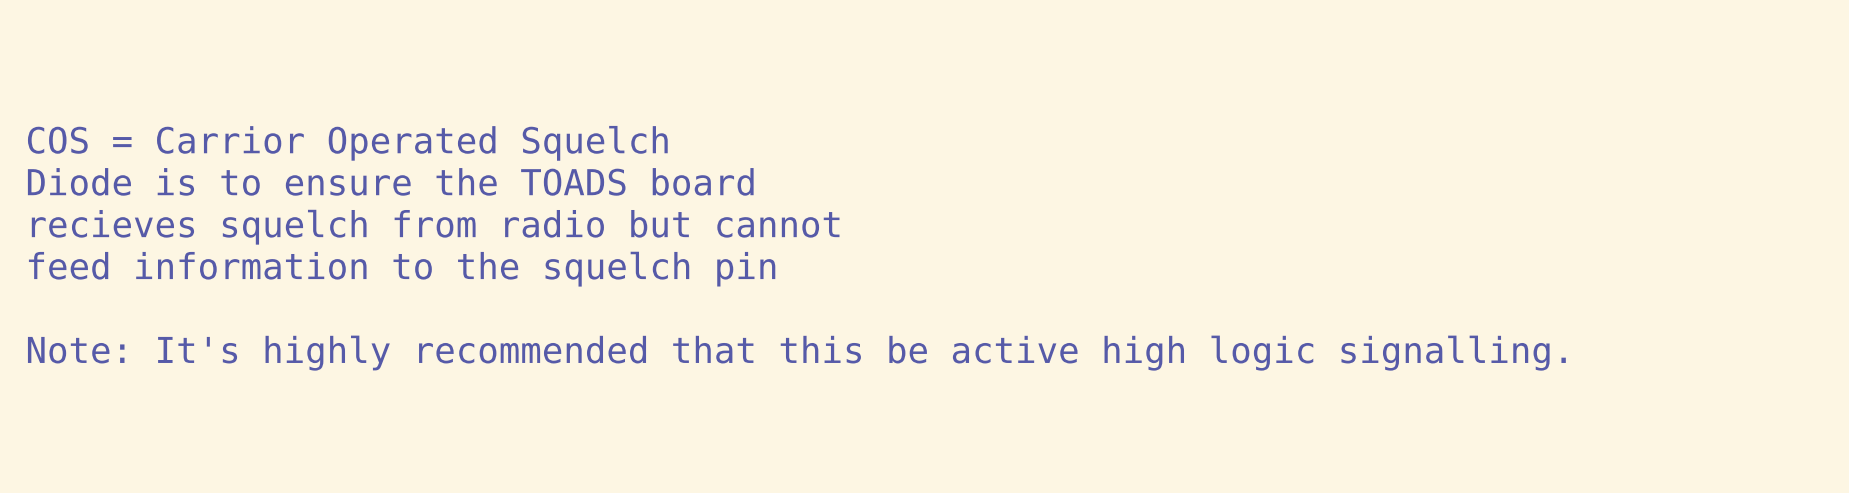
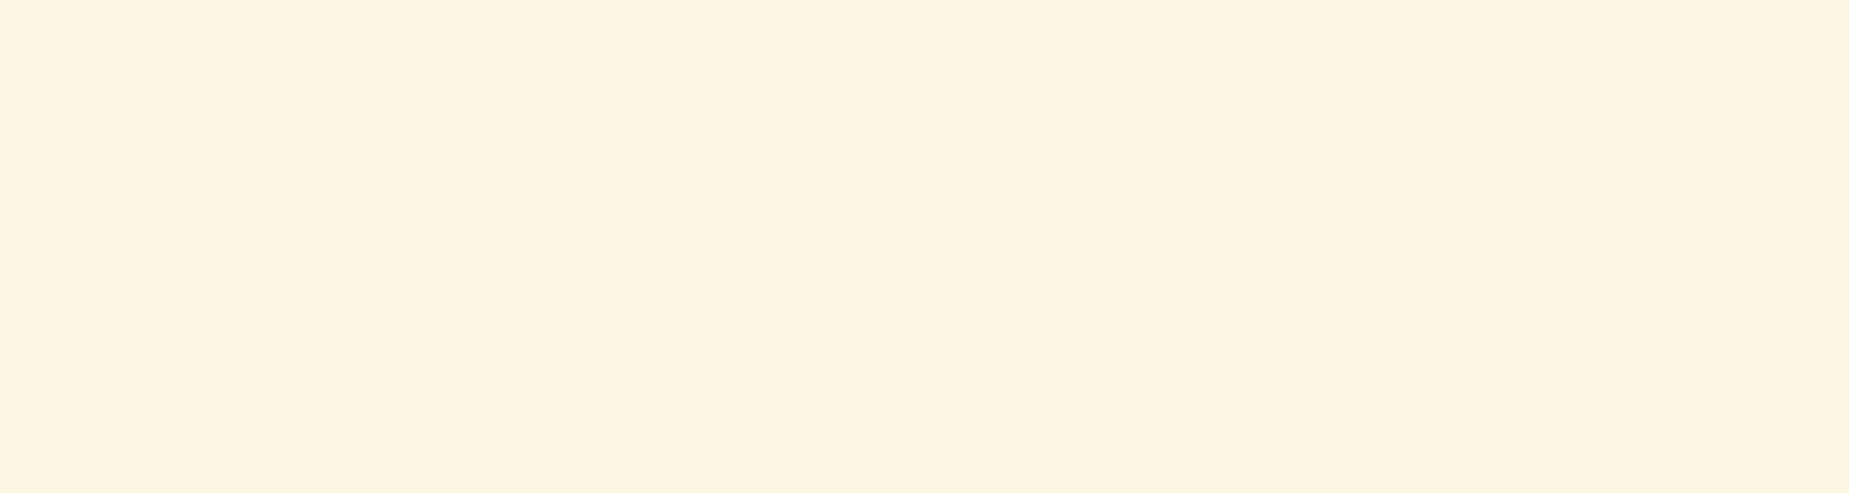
text: COS = Carrior Operated Squelch (347, 143) -> none
text: Diode is to ensure the TOADS board (390, 181) -> none
text: recieves squelch from radio but cannot (435, 227) -> none
text: feed information to the squelch pin (402, 269) -> none
text: Note: It's highly recommended that this be active high logic signalling. (796, 353) -> none

